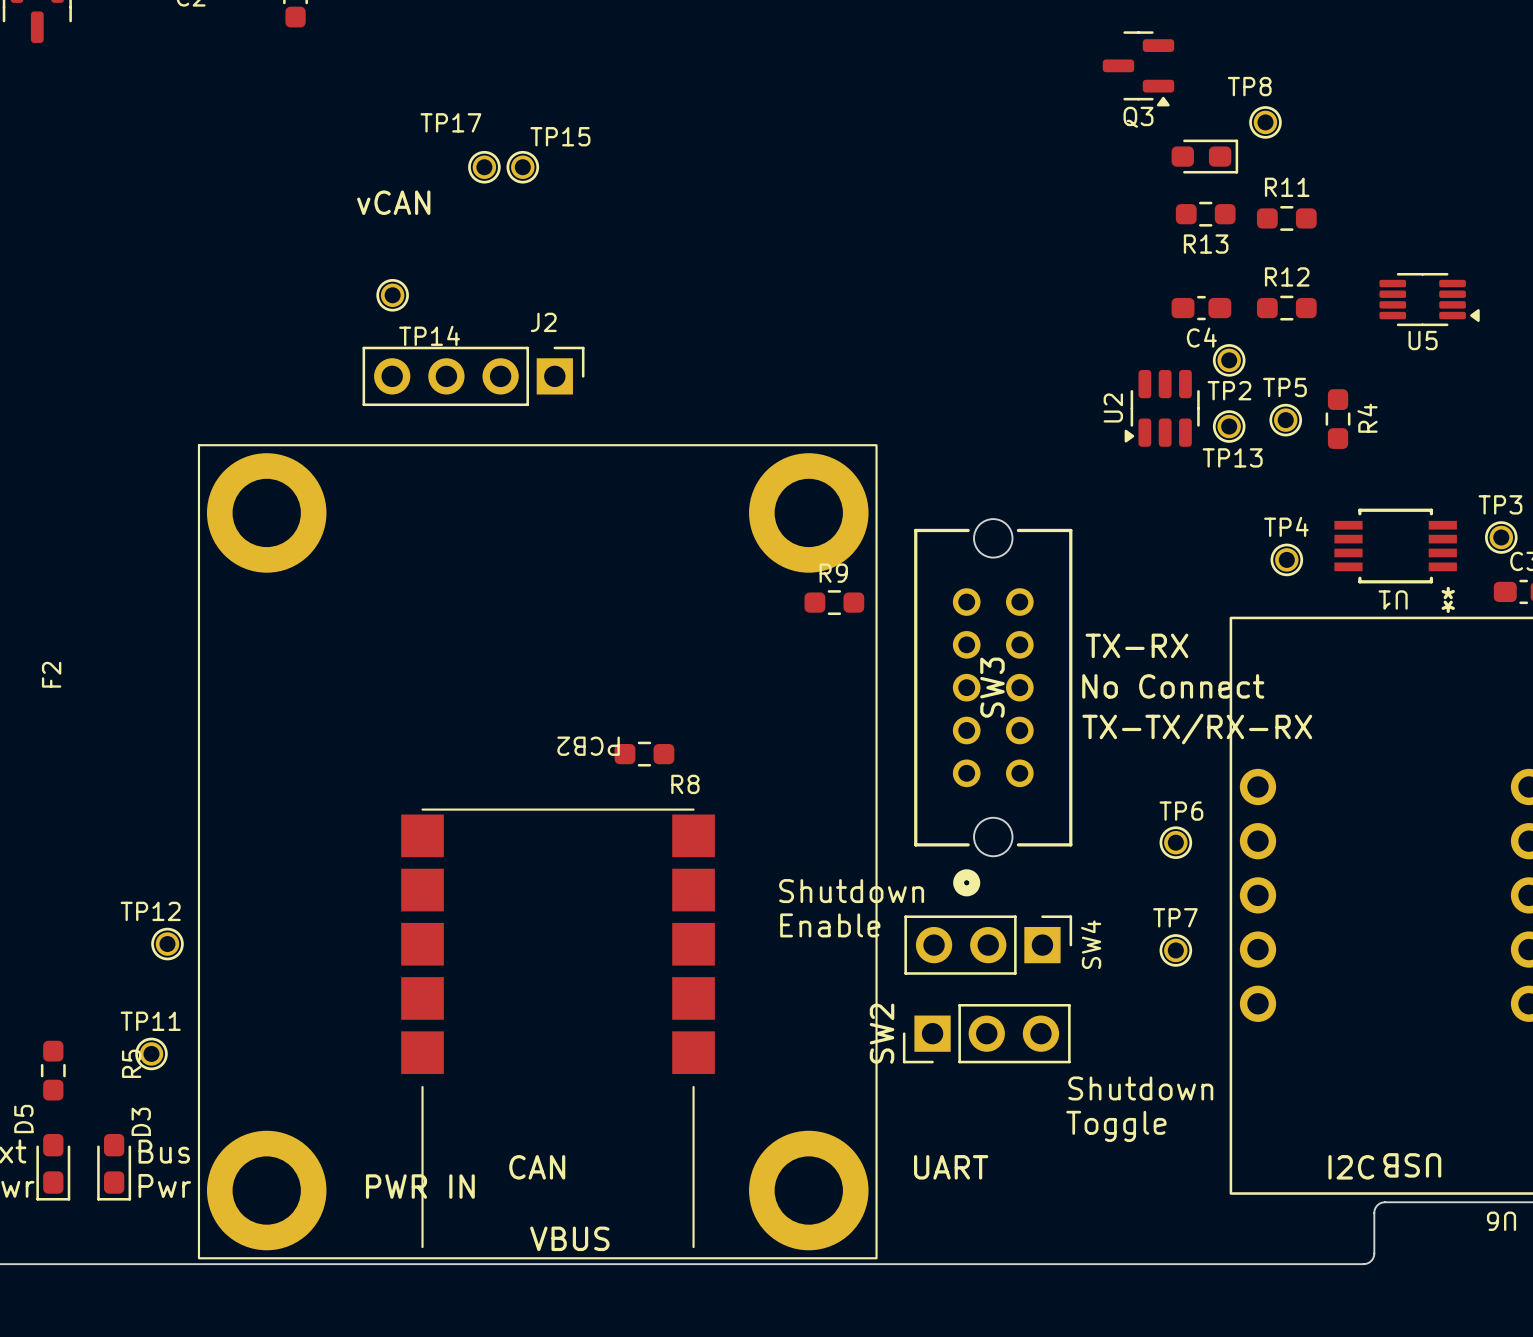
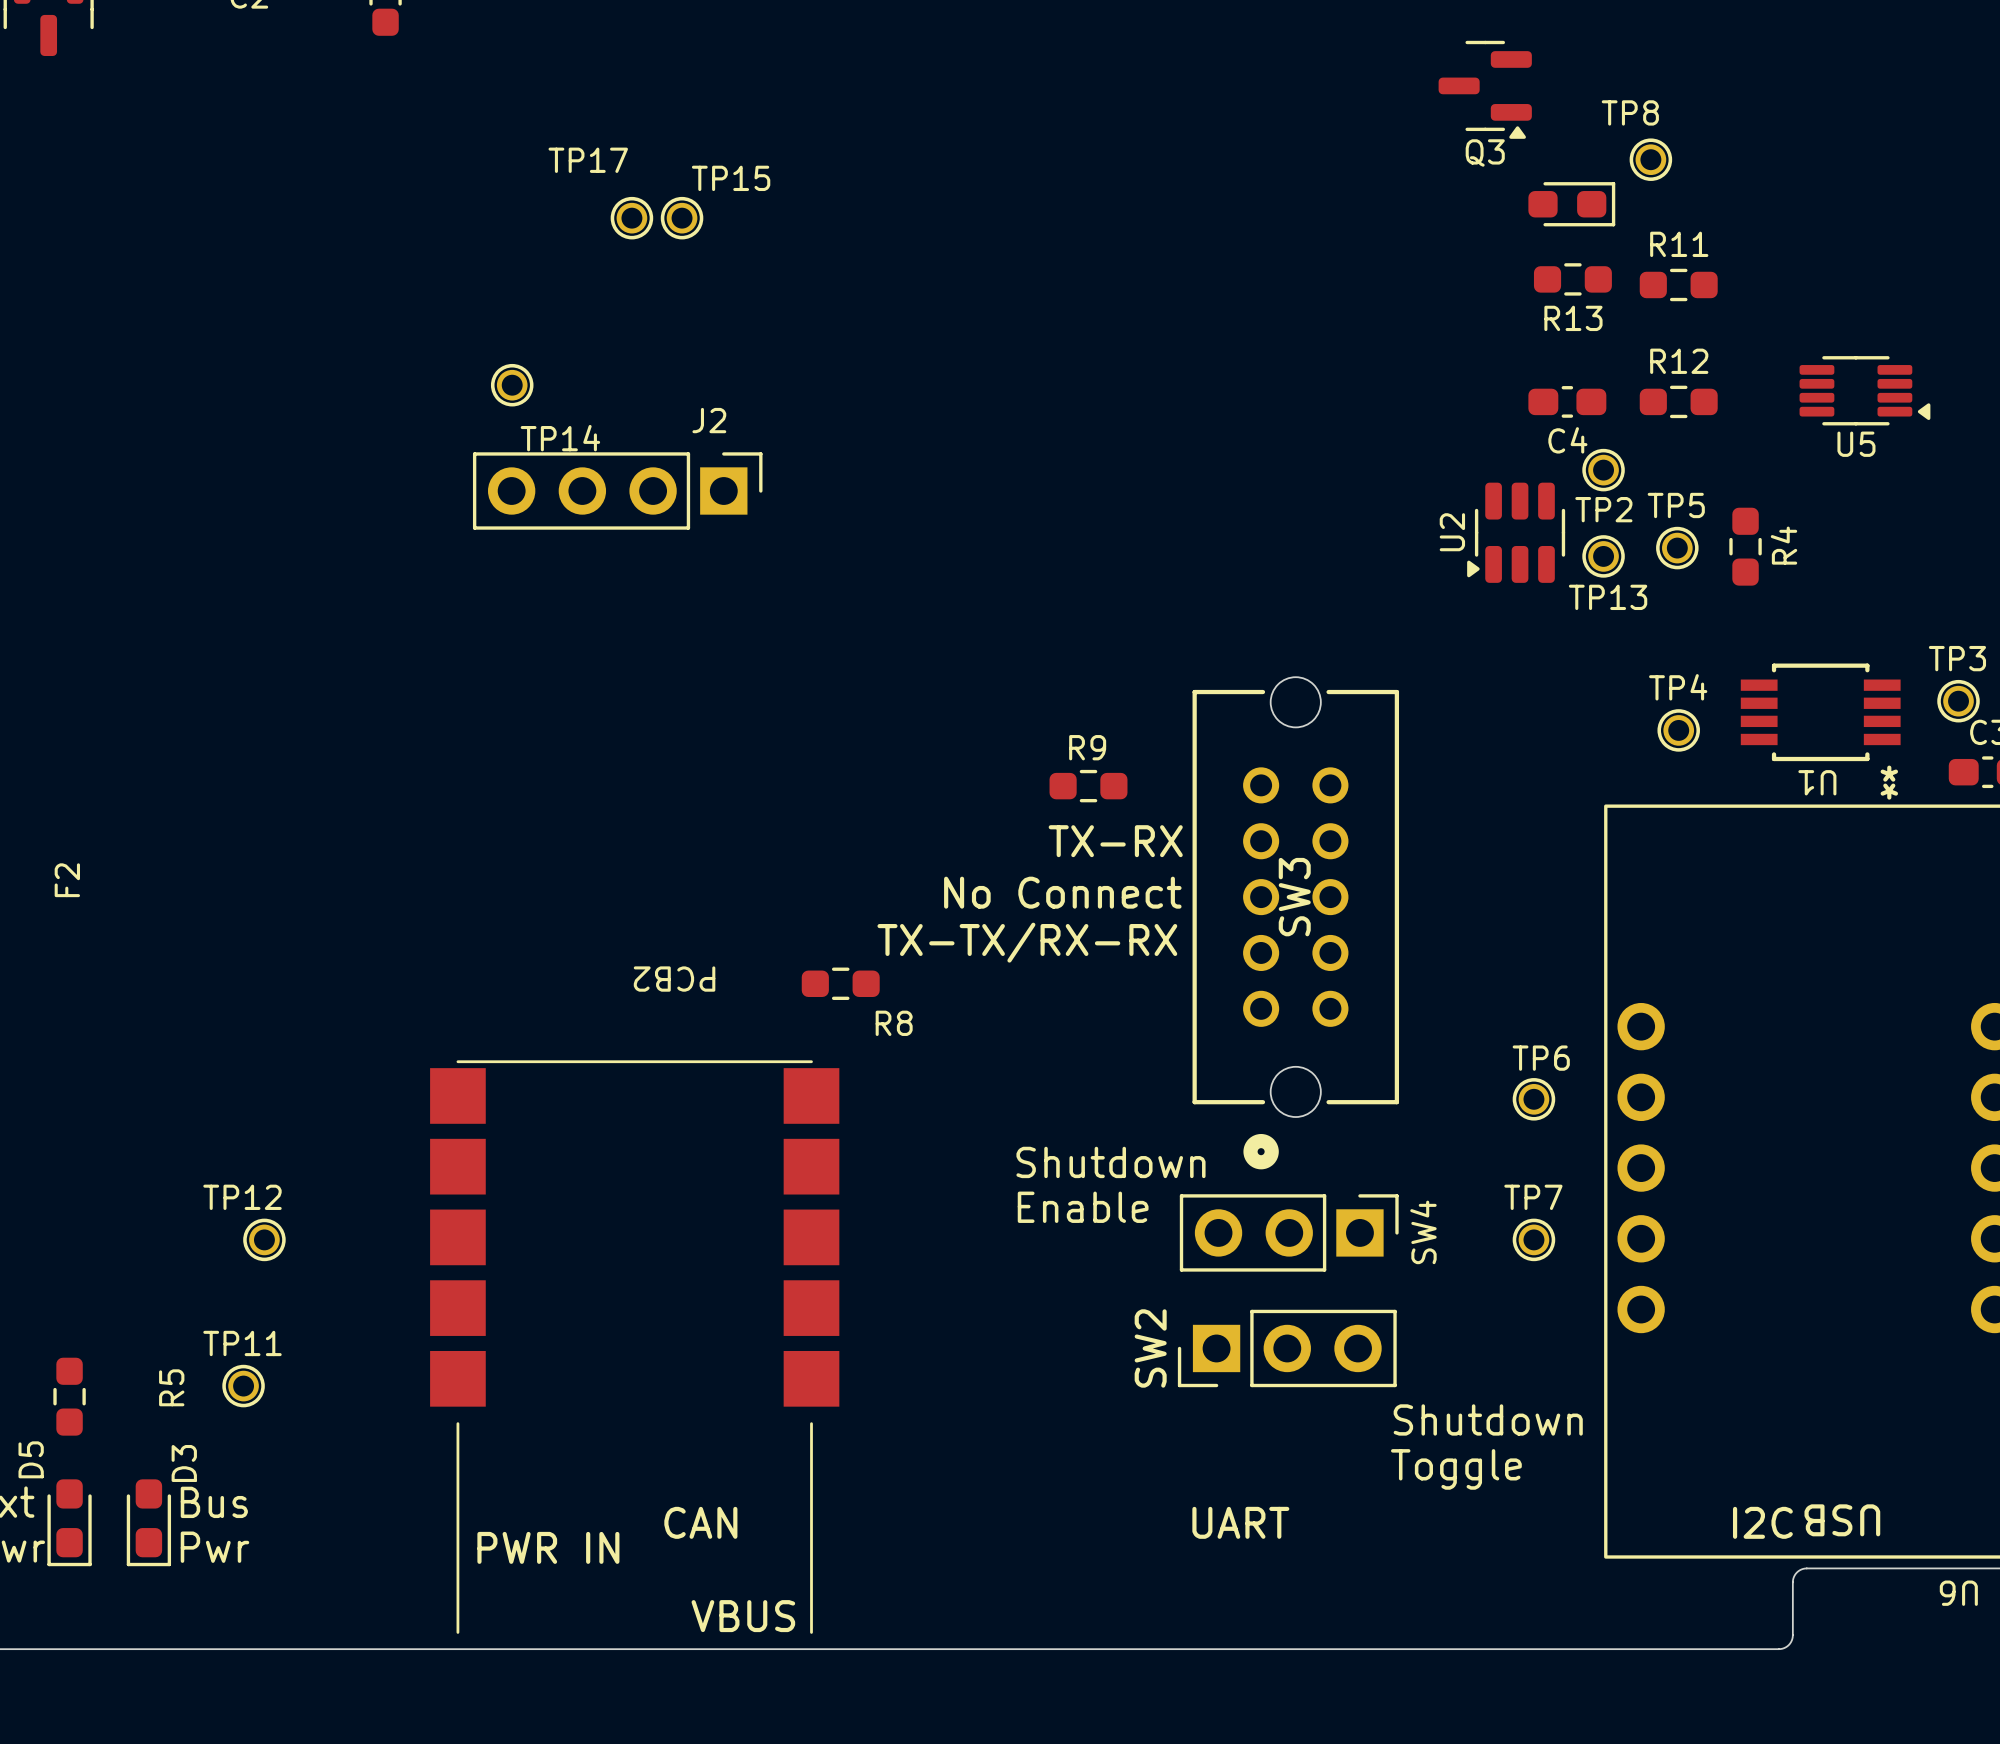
text position: TX-RX (1136, 645) -> TX-RX (1115, 841)
text position: No Connect (1173, 686) -> No Connect (1062, 892)
text position: TX-TX/RX-RX (1197, 728) -> TX-TX/RX-RX (1027, 942)
vCAN: (537, 851) -> none
TP12 position: (167, 944) -> (264, 1239)
PCB2 position: (558, 1028) -> (634, 1347)
TP11 position: (151, 1053) -> (243, 1386)

